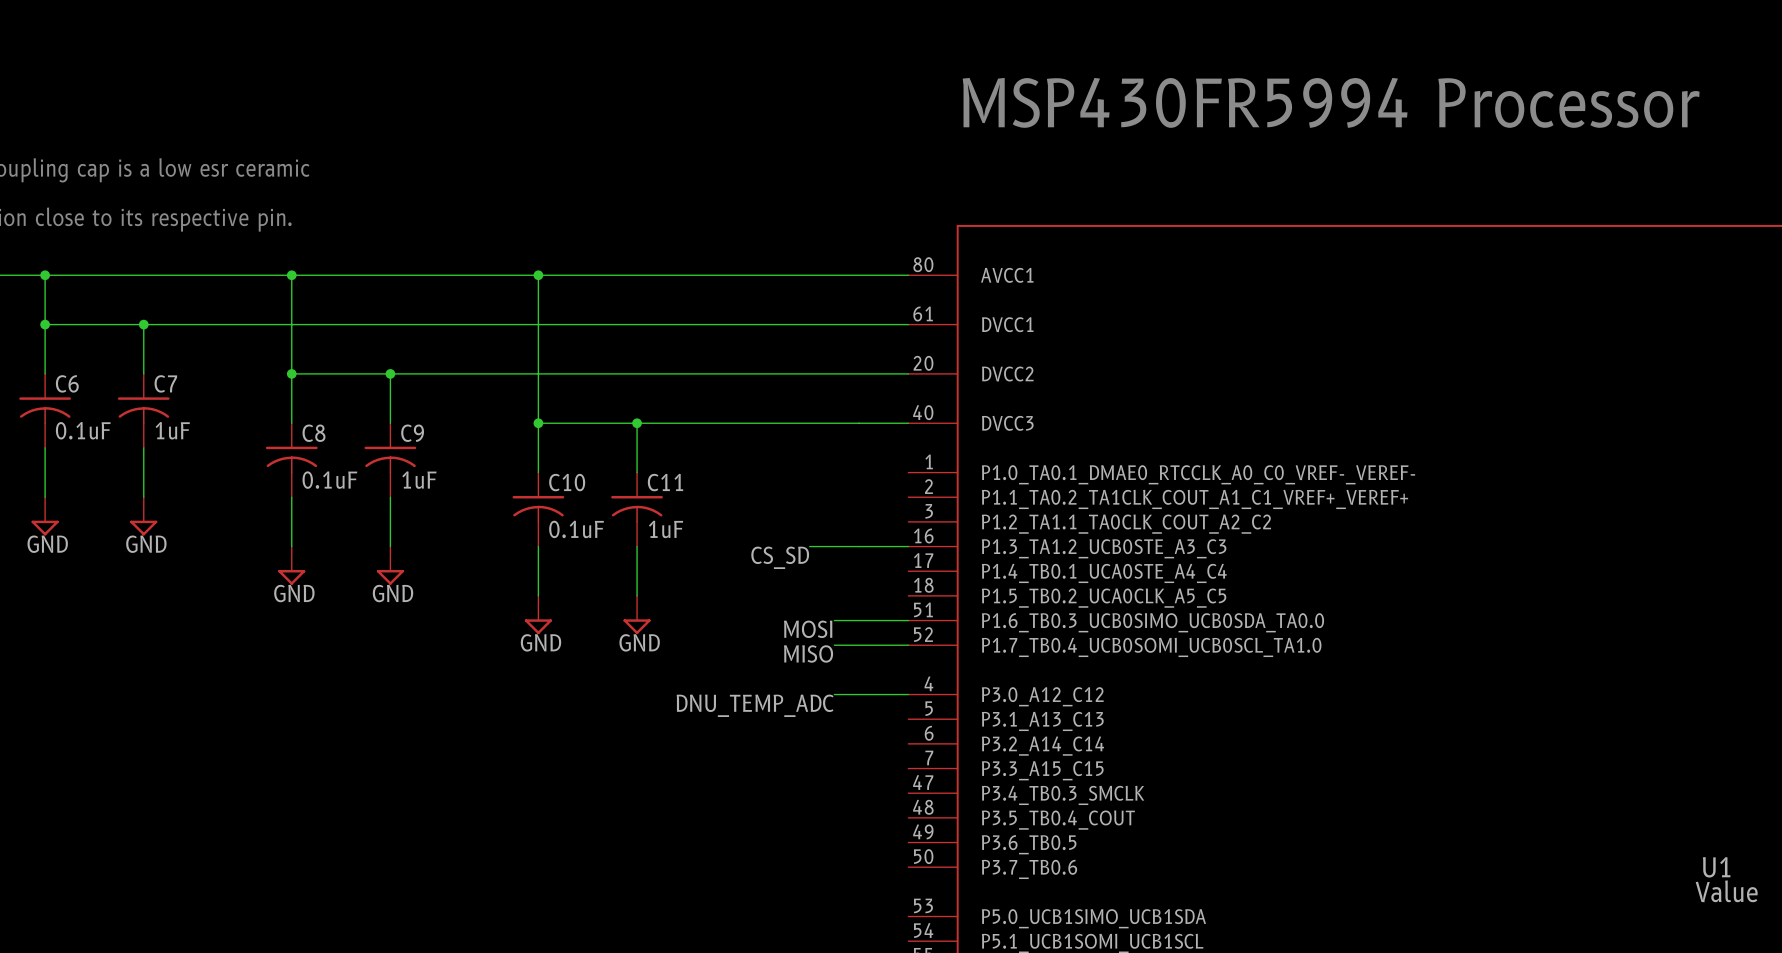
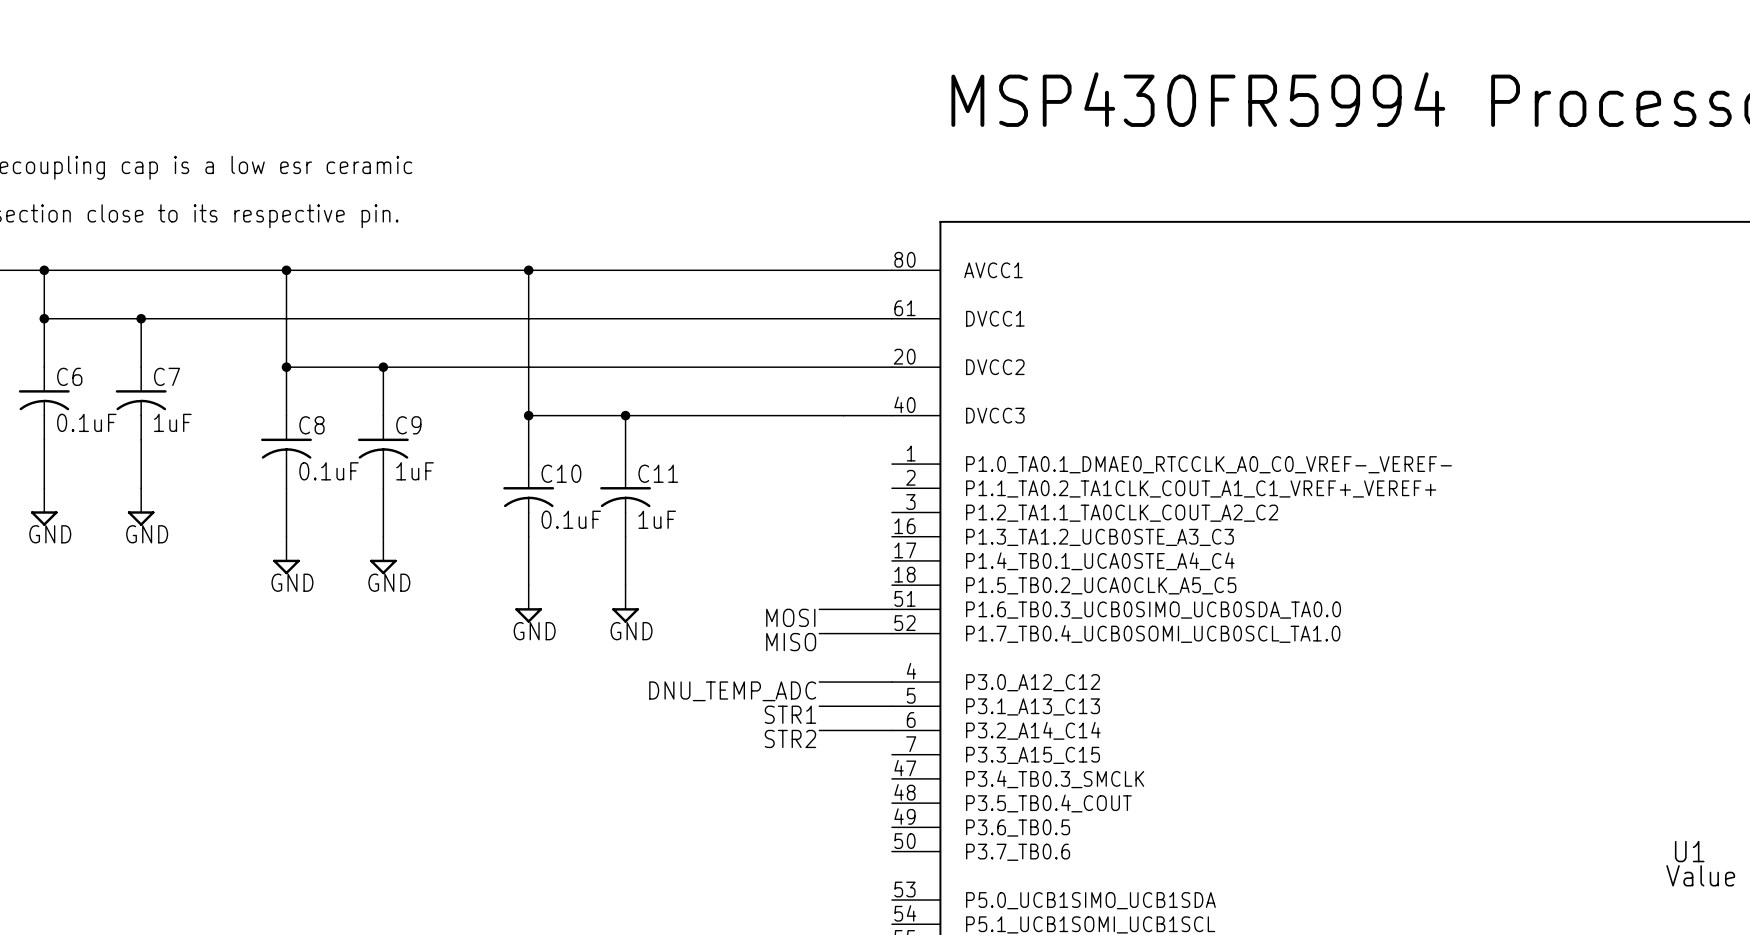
wire: (809, 546) (908, 546) -> none
label: CS_SD (780, 557) -> none
wire: none -> (819, 706) (891, 706)
label: none -> STR1 (790, 714)
wire: none -> (819, 730) (891, 730)
label: none -> STR2 (790, 738)

